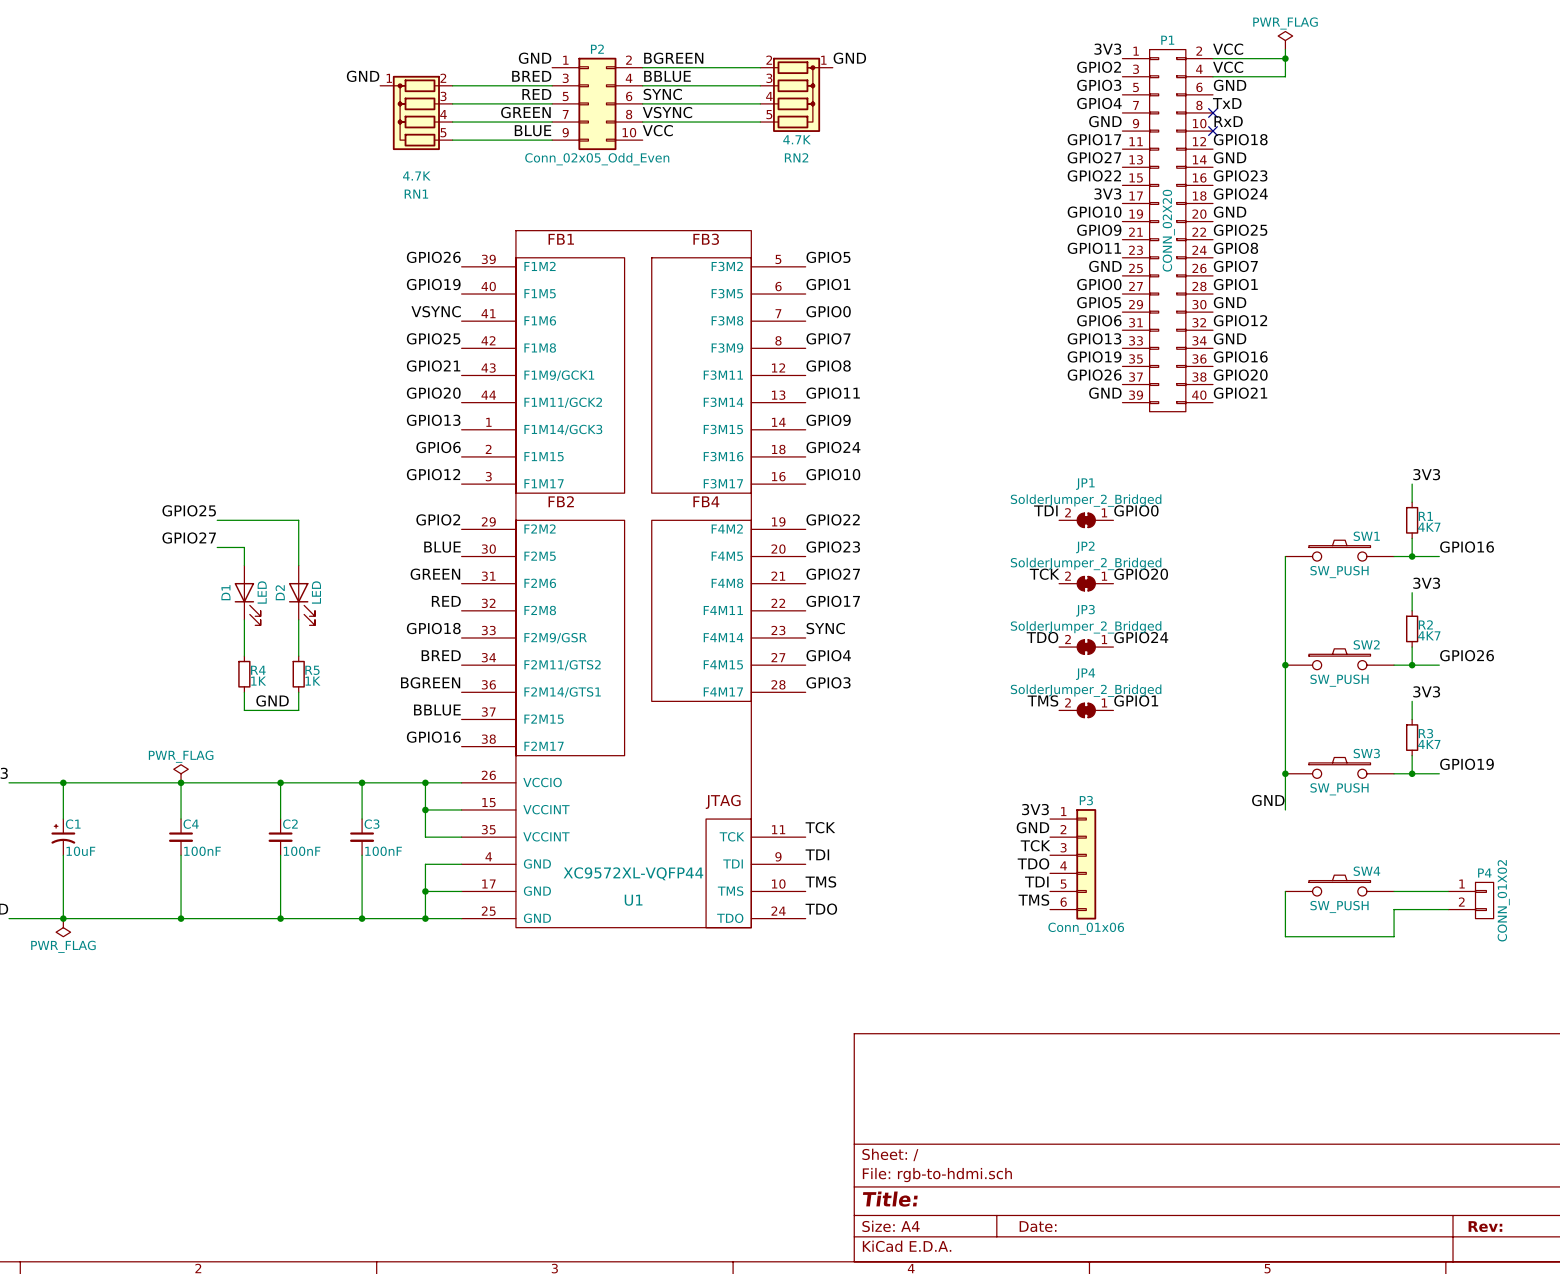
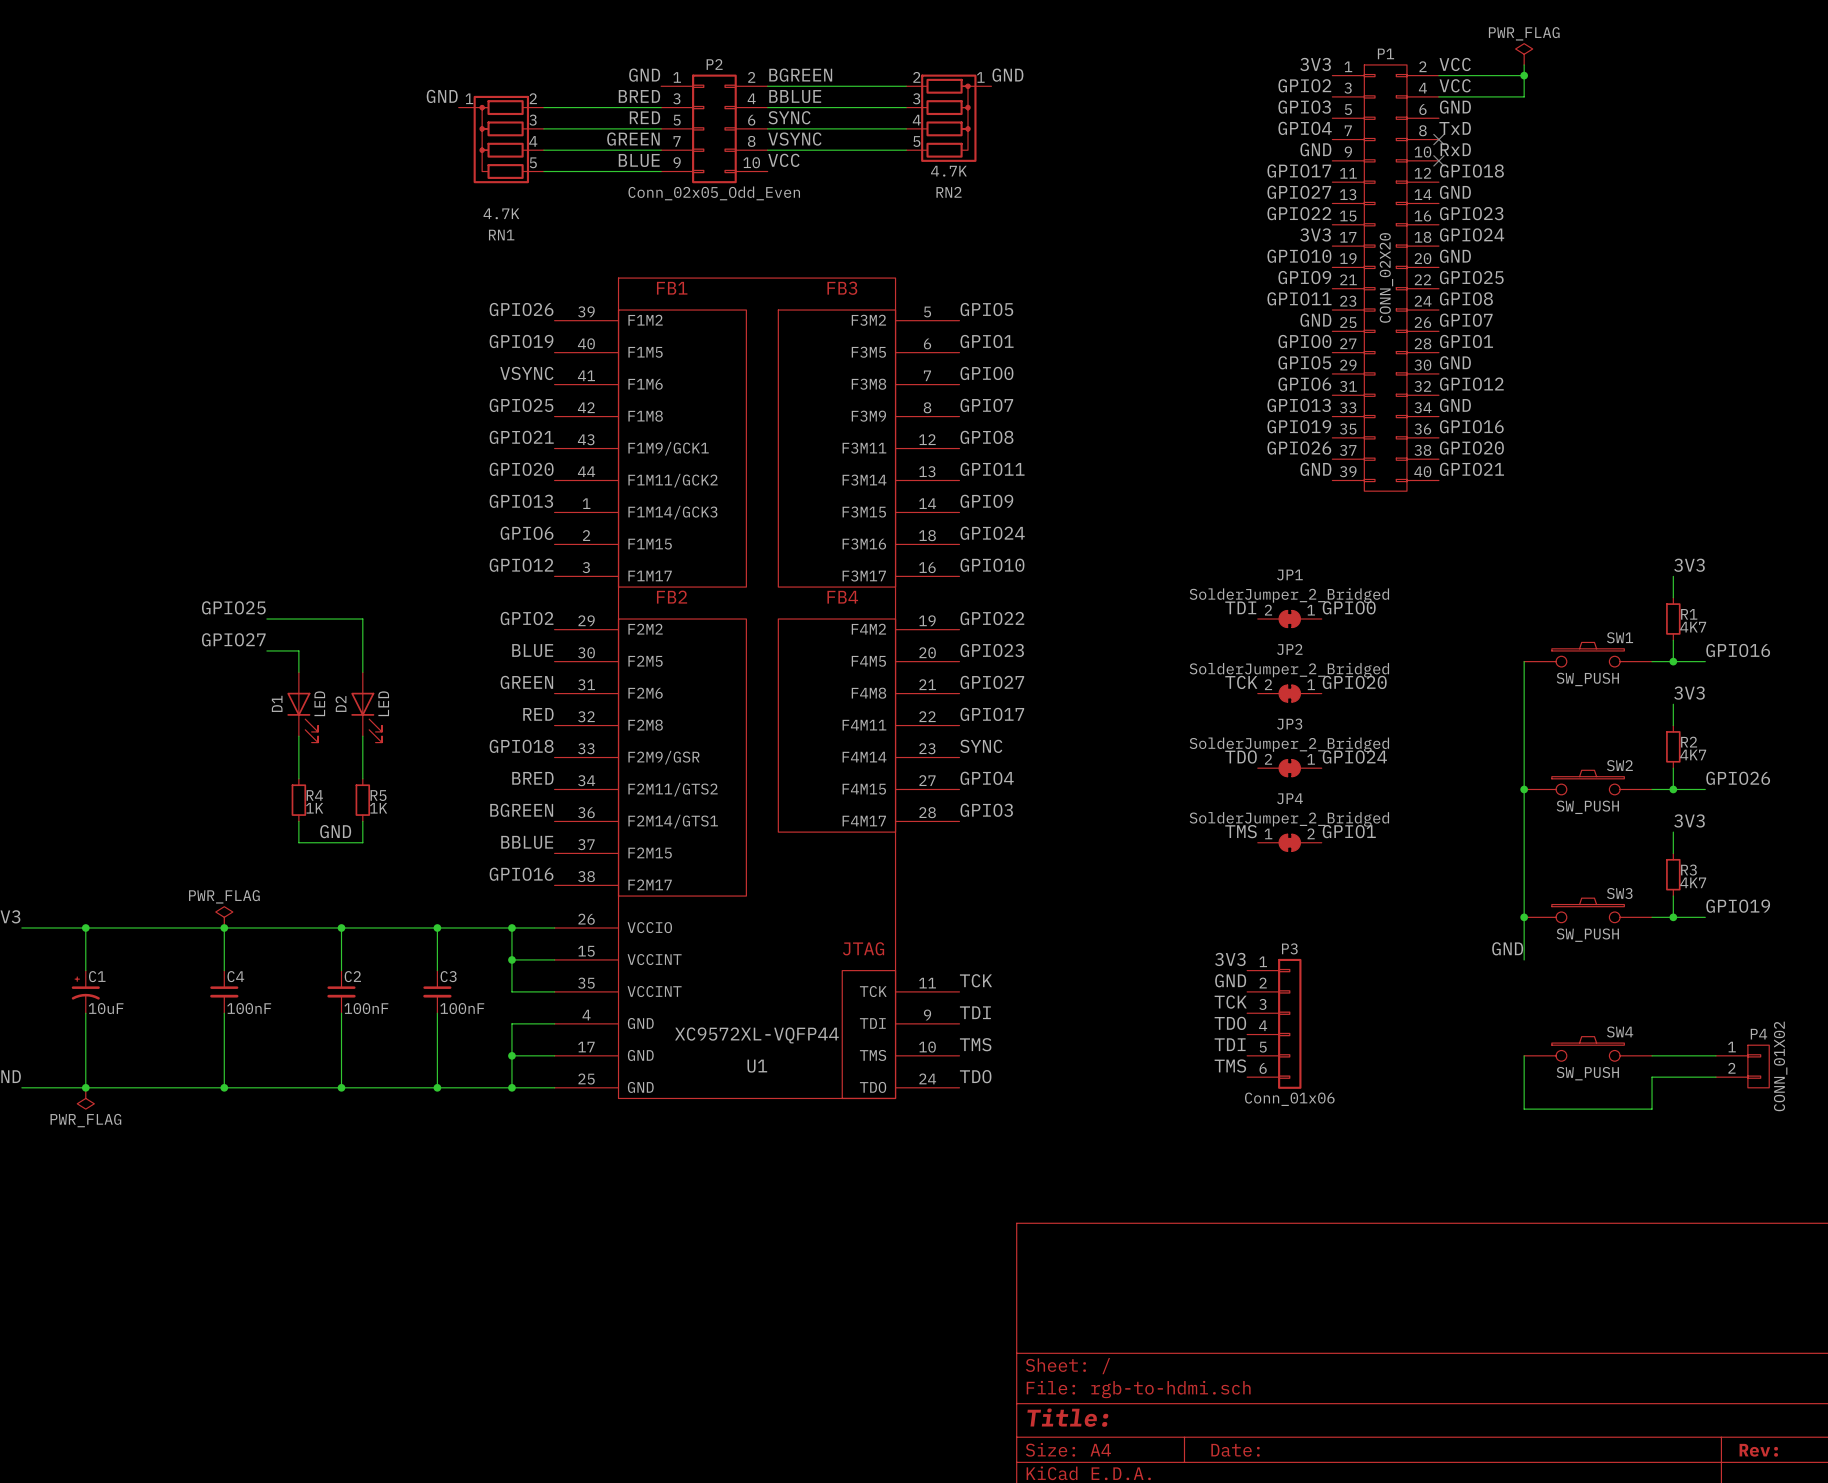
JP4 rotation: 0° (1086, 710) -> 180° (1289, 842)

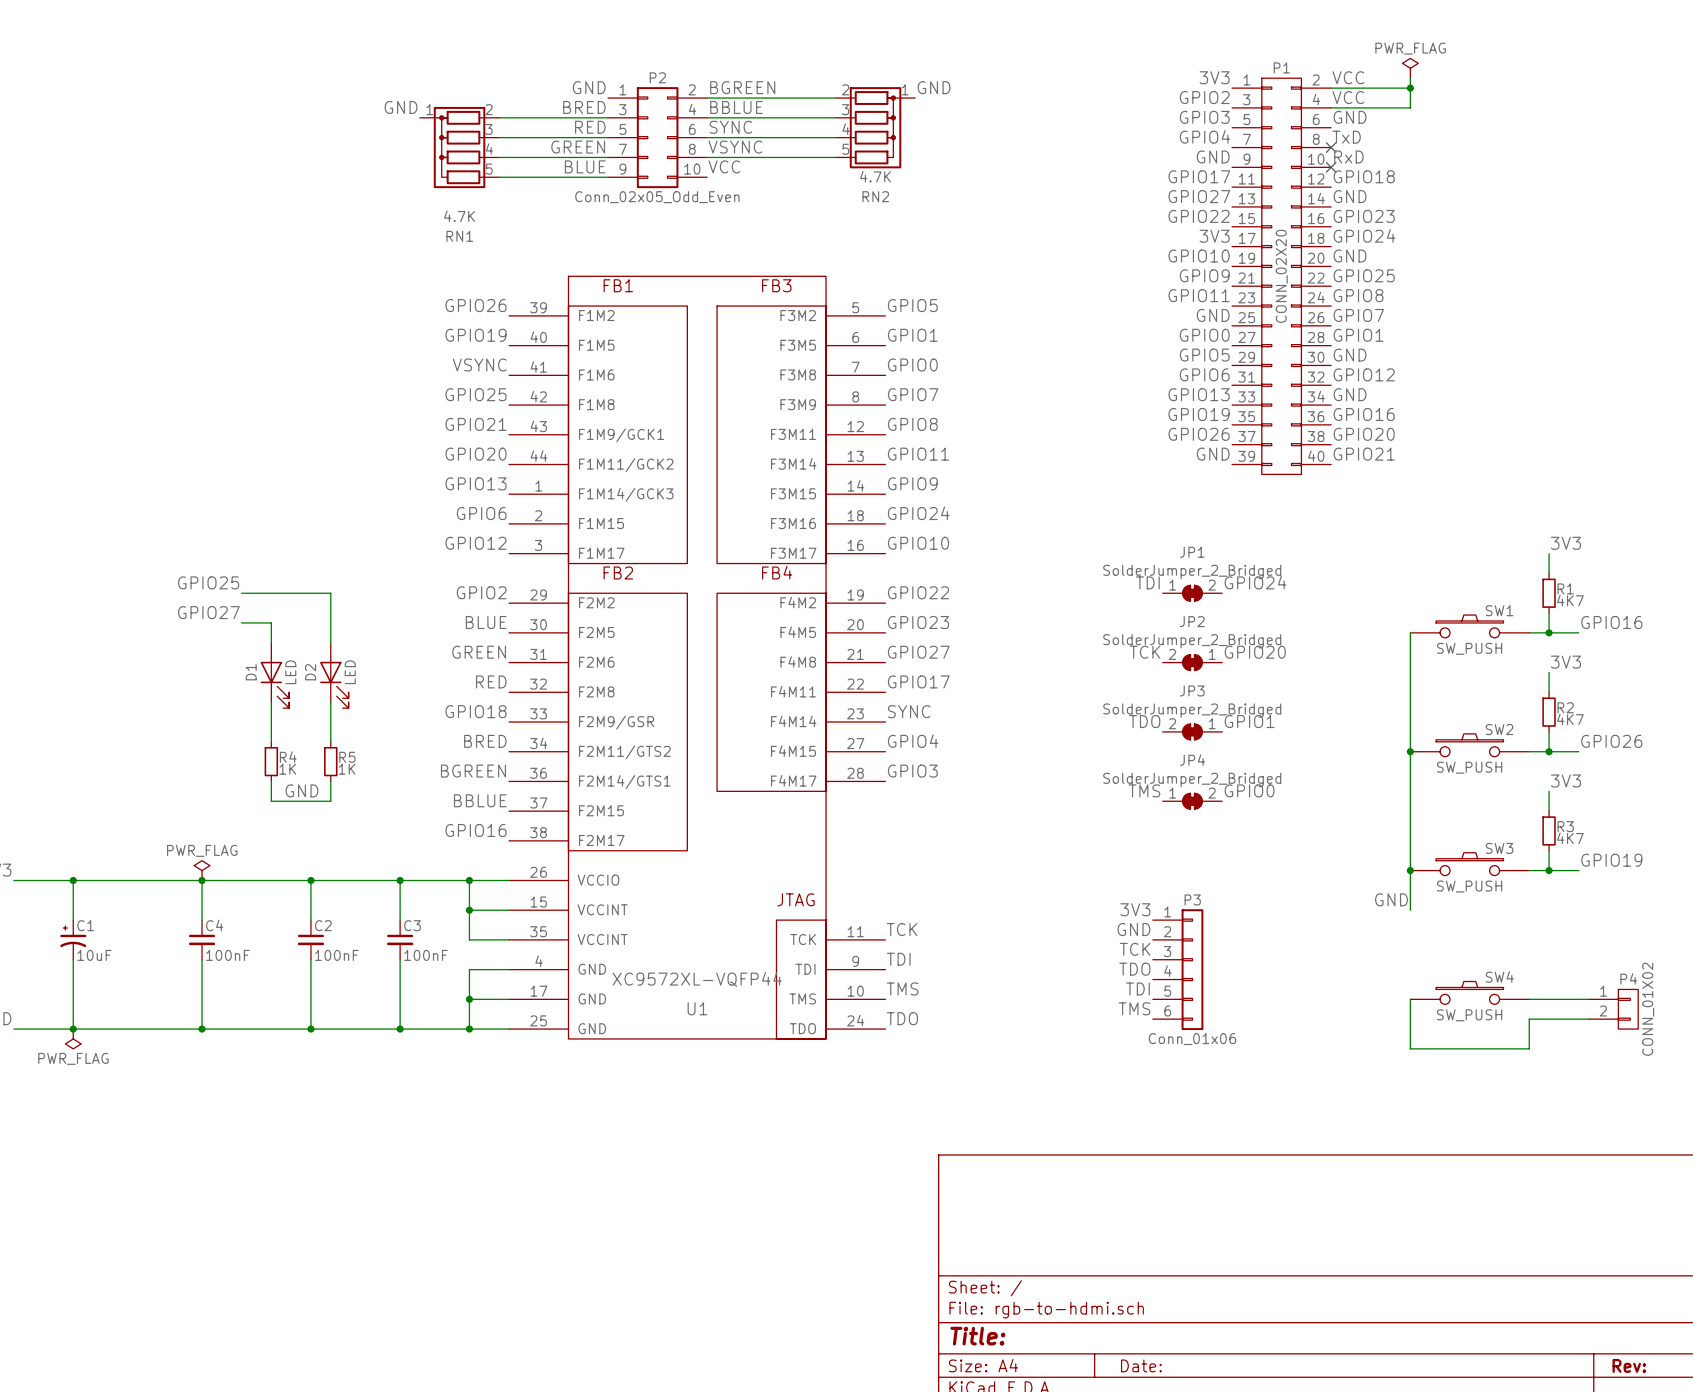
label: GPIO0 (1349, 607) -> GPIO24 (1255, 582)
JP1 rotation: 0° (1289, 619) -> 180° (1192, 593)
label: GPIO24 (1354, 757) -> GPIO1 (1249, 721)
label: GPIO1 (1349, 831) -> GPIO0 (1249, 790)

